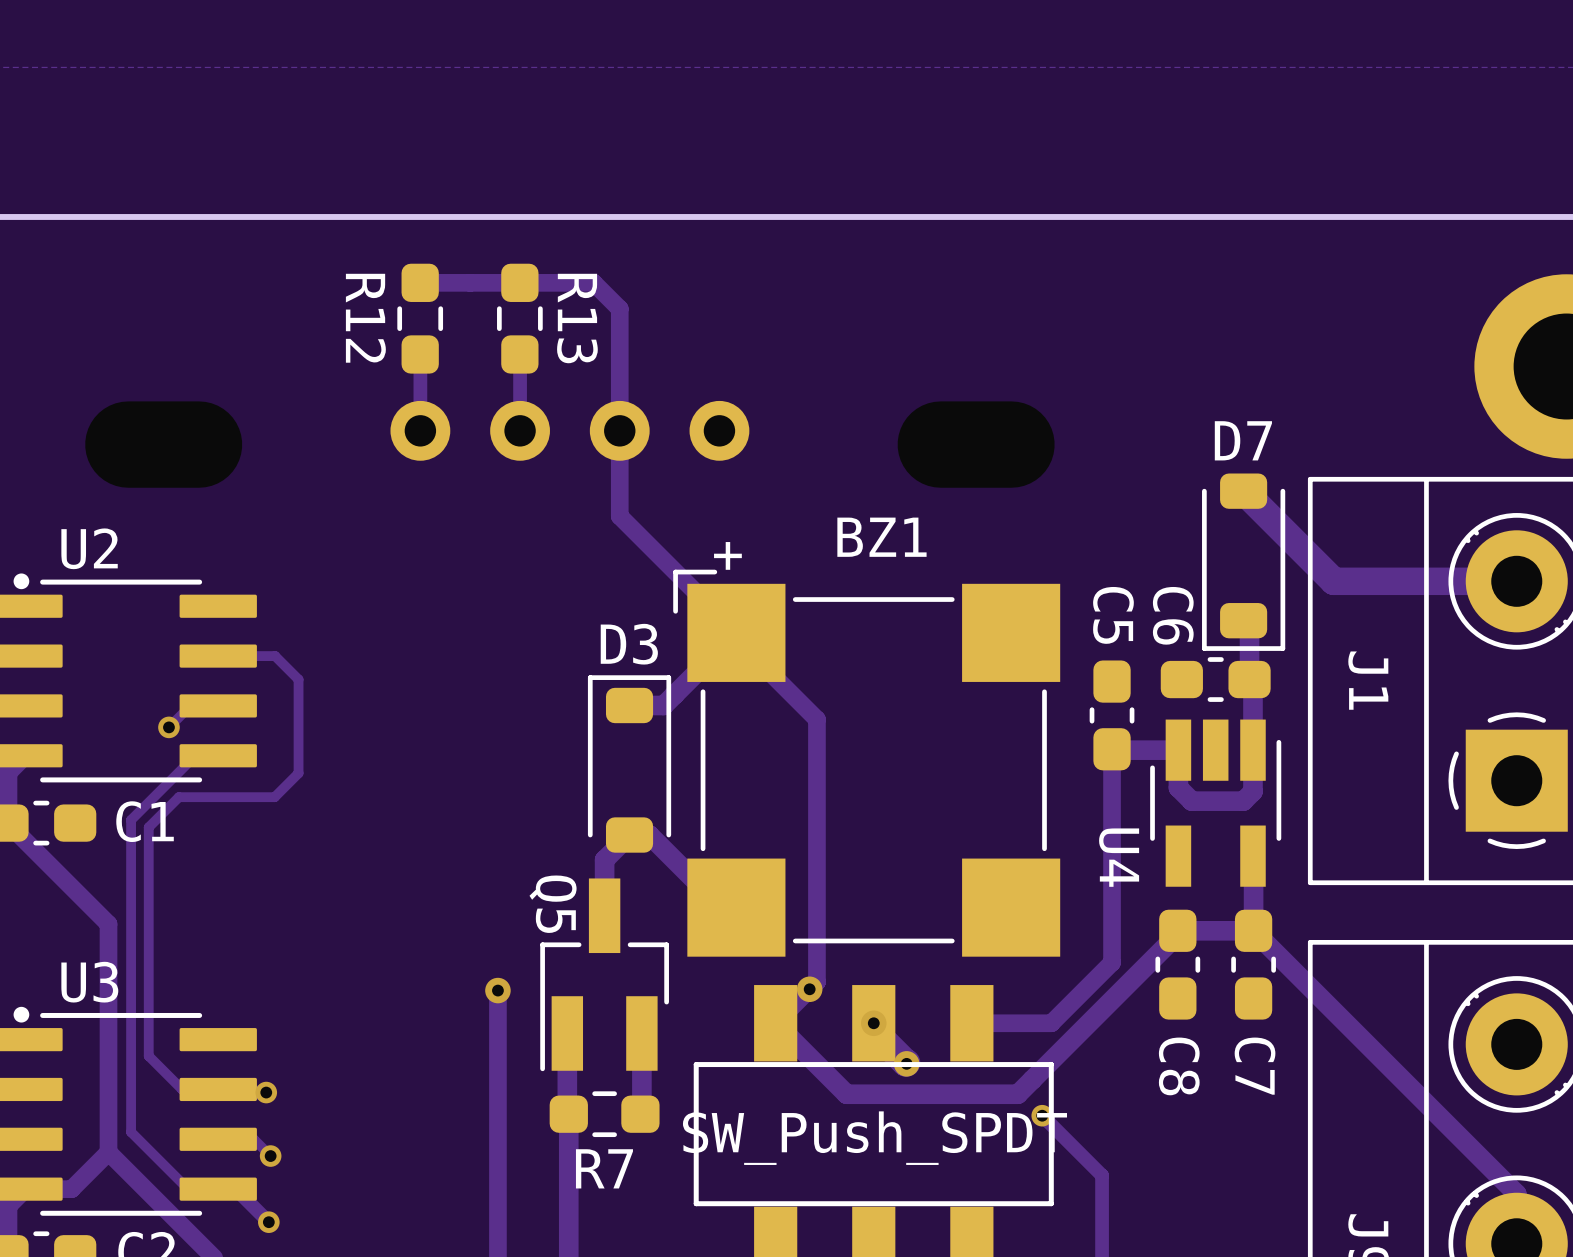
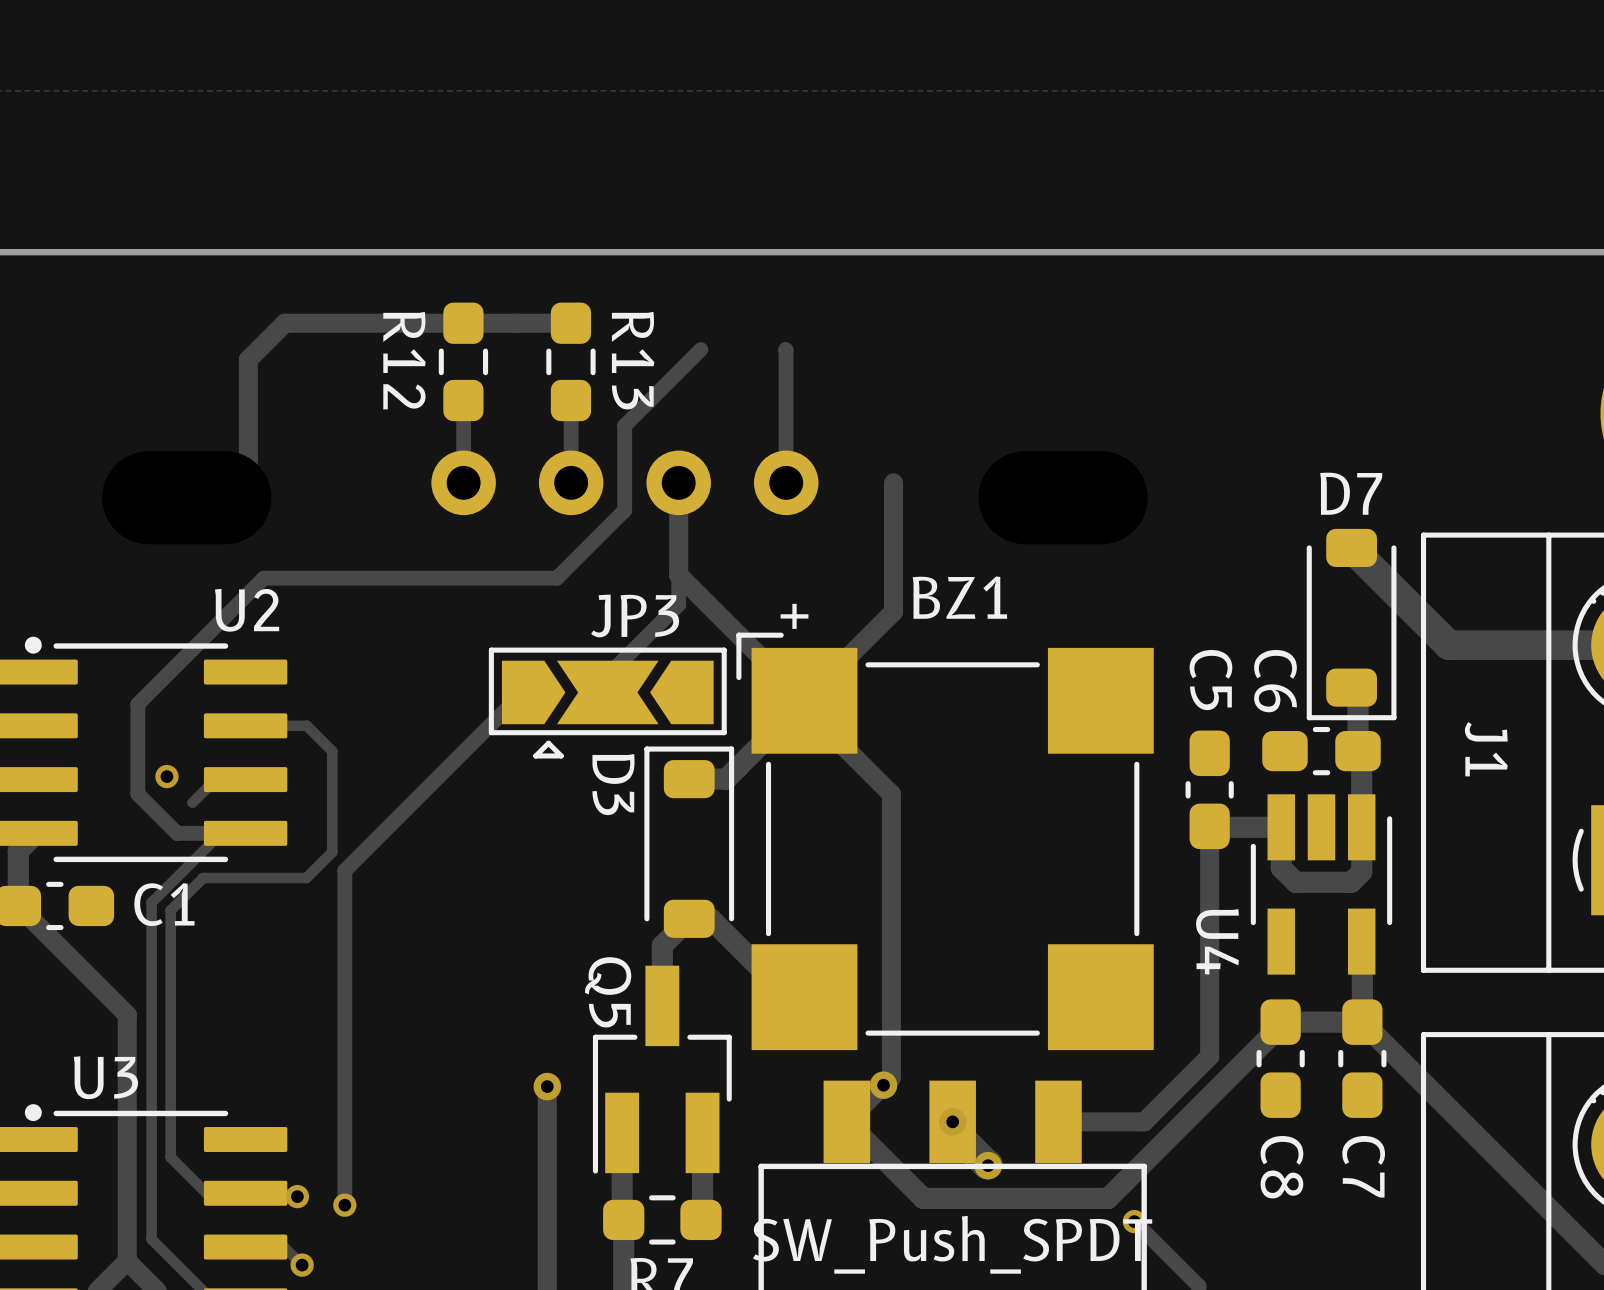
track: none -> (463, 323) (284, 323) (248, 359) (248, 482)
track: (519, 282) (593, 282) (619, 308) (619, 430) -> none
track: none -> (700, 349) (624, 425) (624, 510) (556, 578) (263, 578) (137, 704) (137, 794) (177, 833) (245, 833)
track: none -> (786, 349) (786, 482)
track: none -> (893, 482) (893, 611) (804, 700)
track: none -> (678, 574) (678, 604) (607, 675) (607, 692)
U2 name position: U2 (89, 548) -> U2 (247, 610)
track: none -> (523, 692) (344, 870) (344, 1205)
JP3: none -> (607, 703)
D3 name rotation: 0° (629, 644) -> 90° clockwise (613, 784)
via position: (168, 727) -> (166, 776)
via: none -> (344, 1205)

